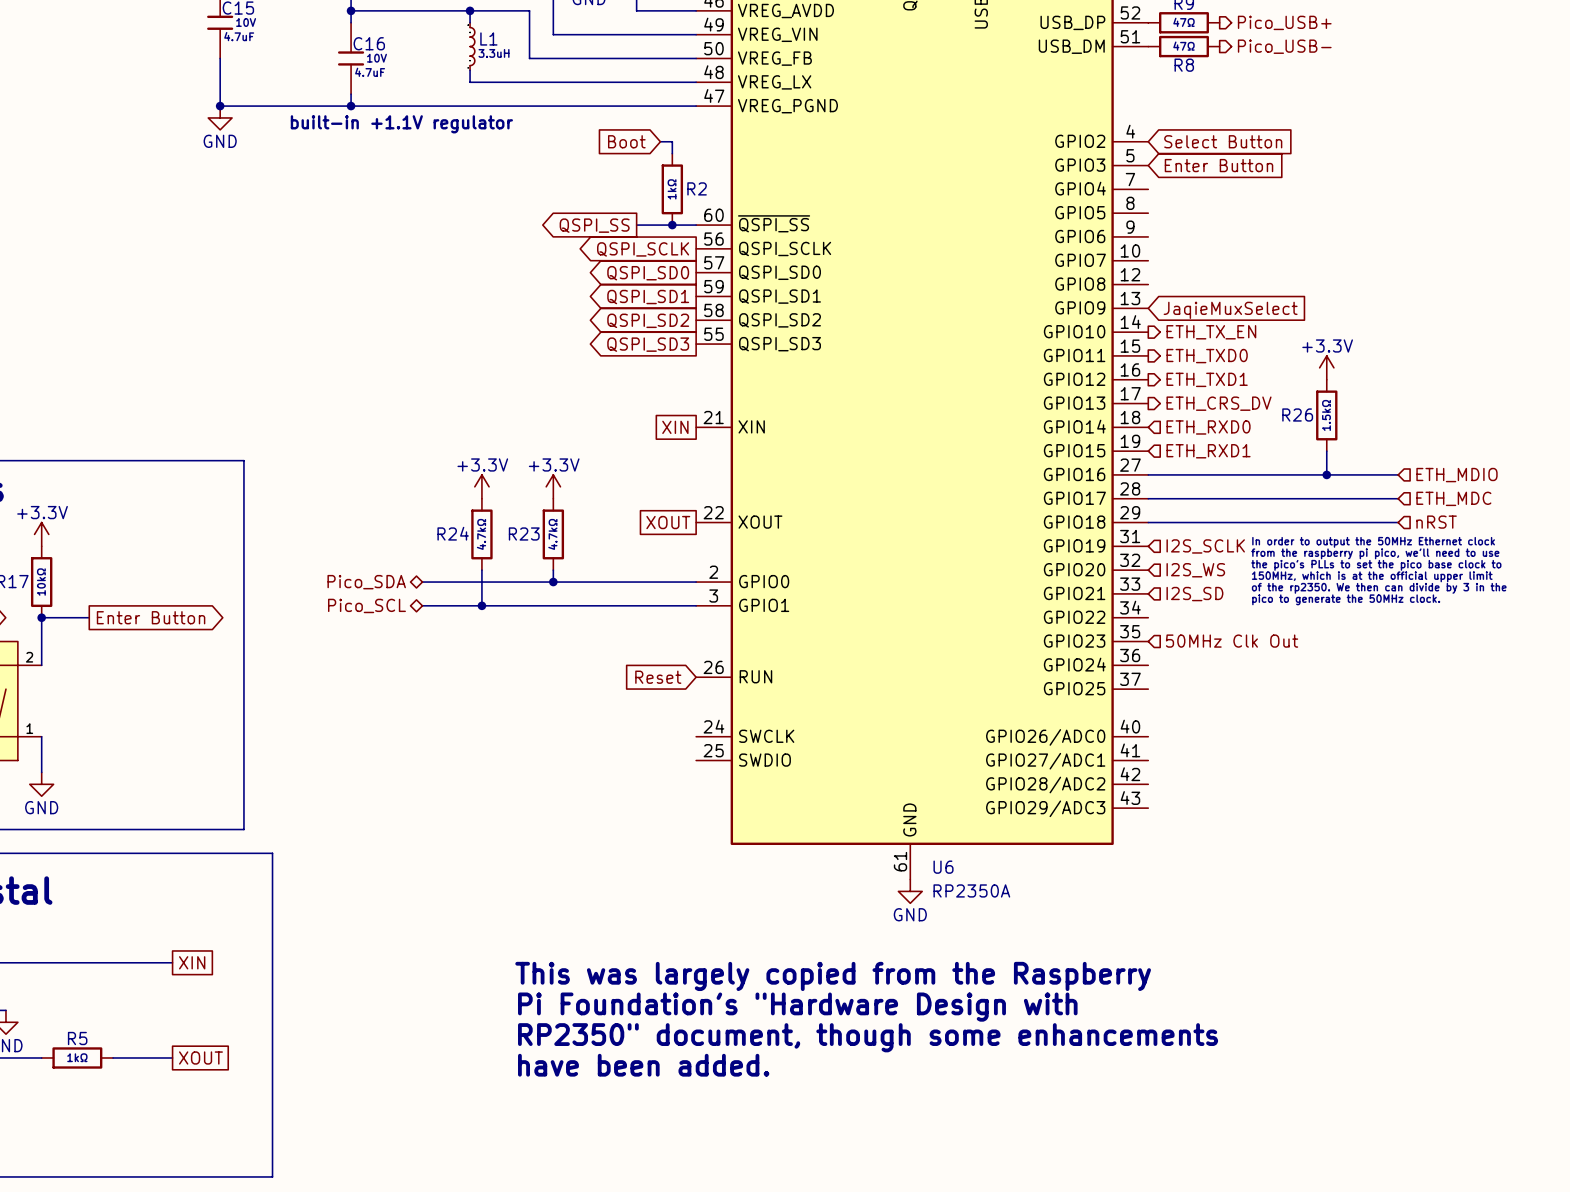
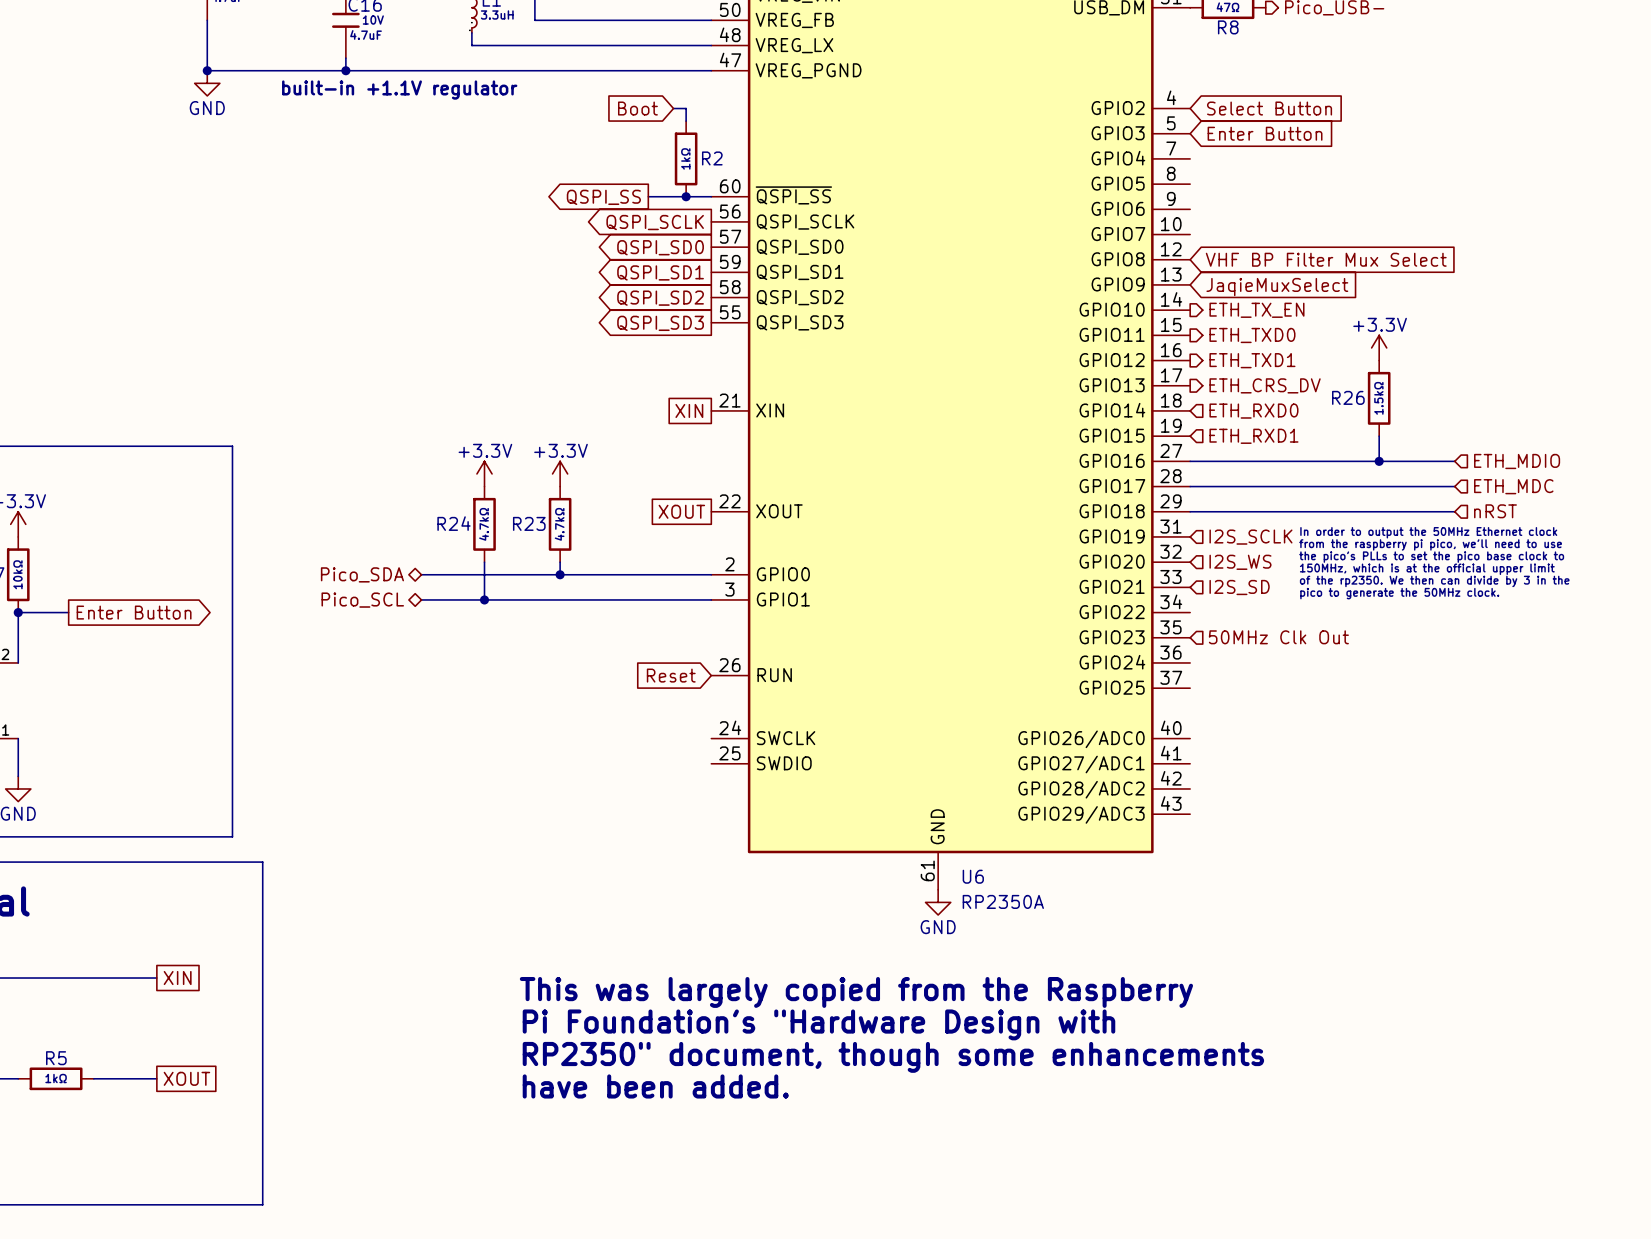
global label: none -> VHF BP Filter Mux Select (1326, 259)

